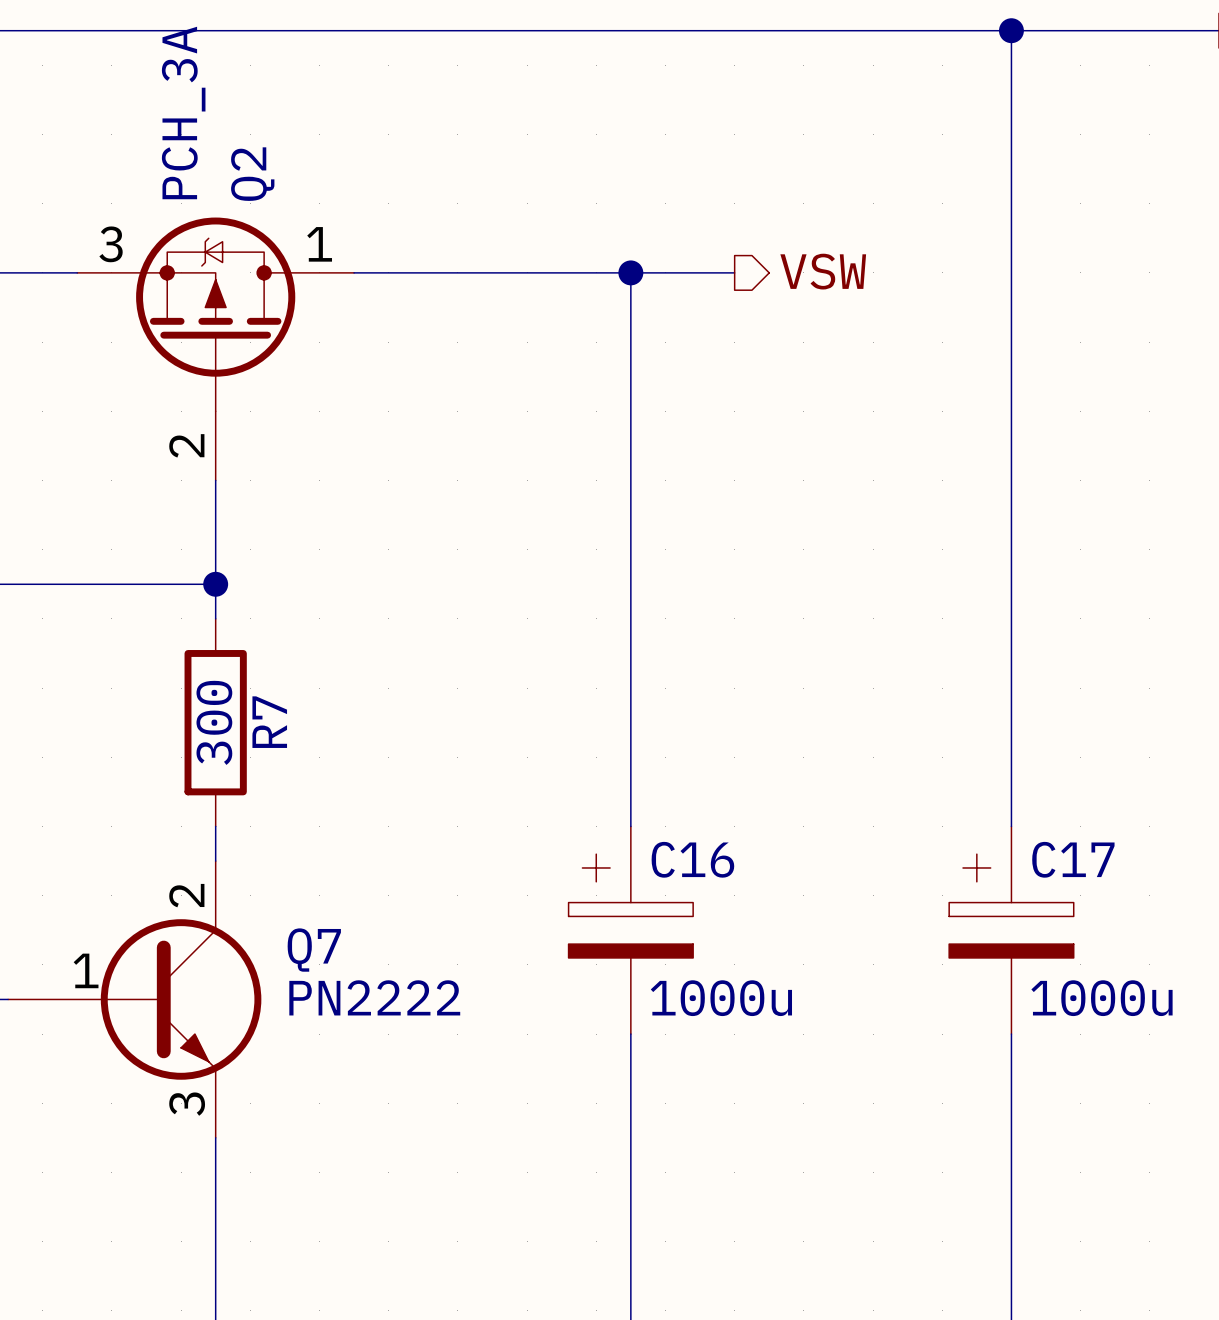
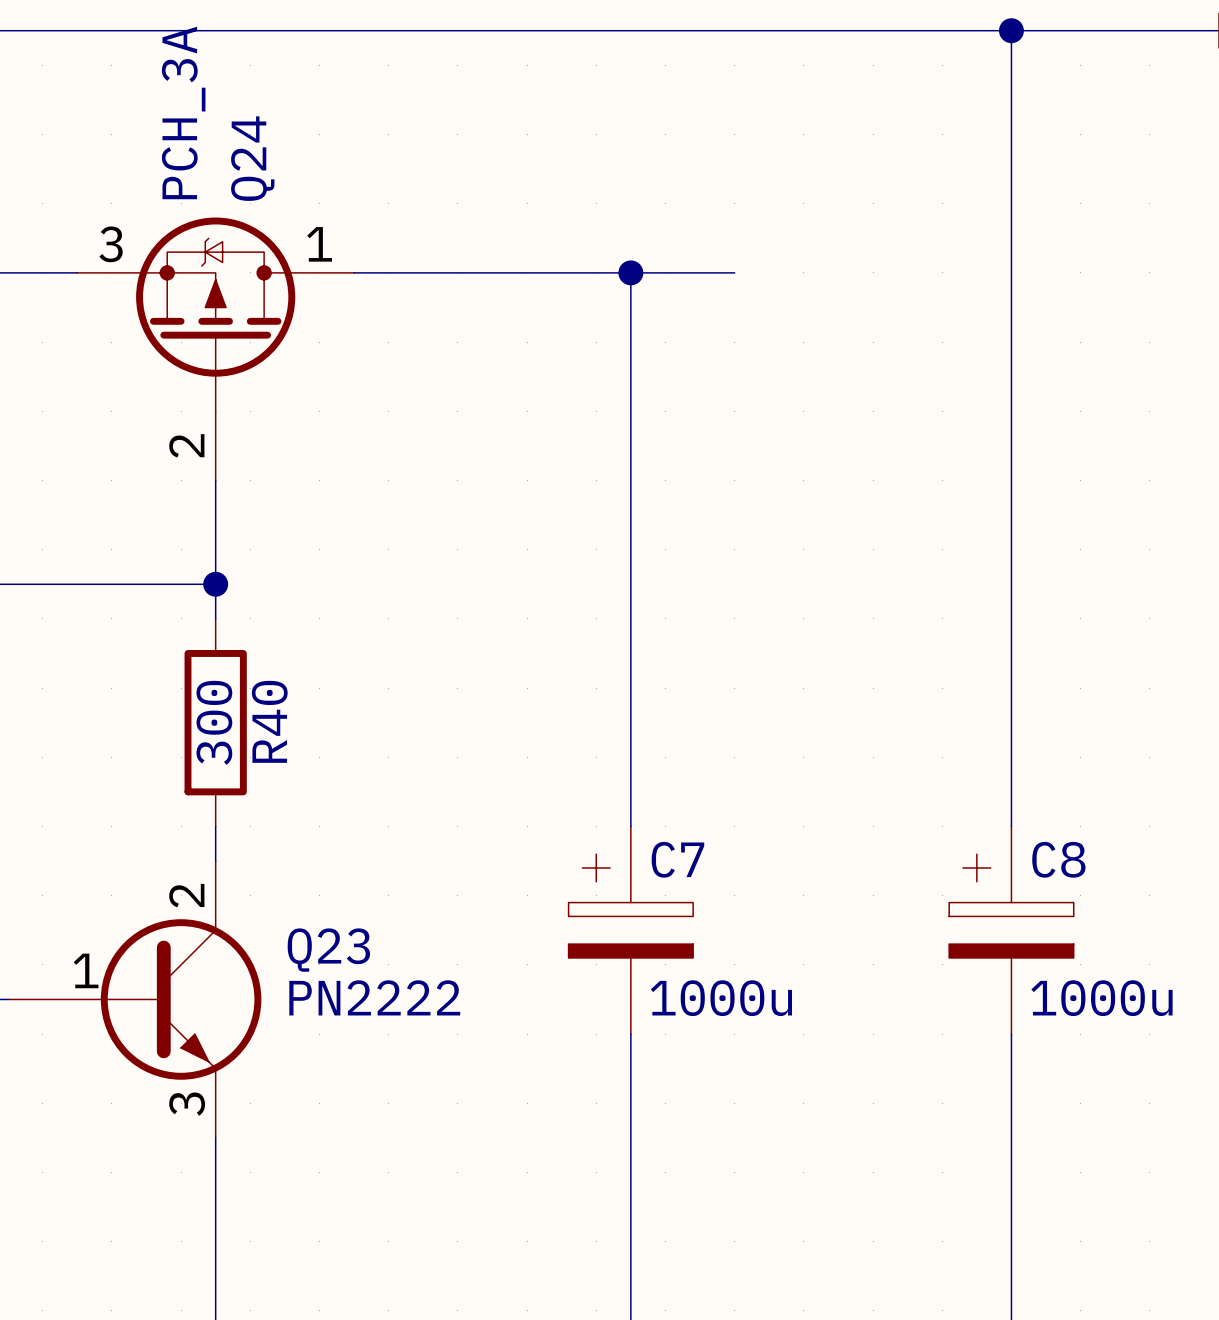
Q2 name: Q2 (252, 174) -> Q24 (252, 158)
hierarchical label: VSW (823, 271) -> none
R7 name: R7 (269, 722) -> R40 (269, 721)
C16 name: C16 (692, 859) -> C7 (677, 859)
C17 name: C17 (1073, 859) -> C8 (1058, 859)
Q7 name: Q7 (314, 950) -> Q23 (328, 950)

